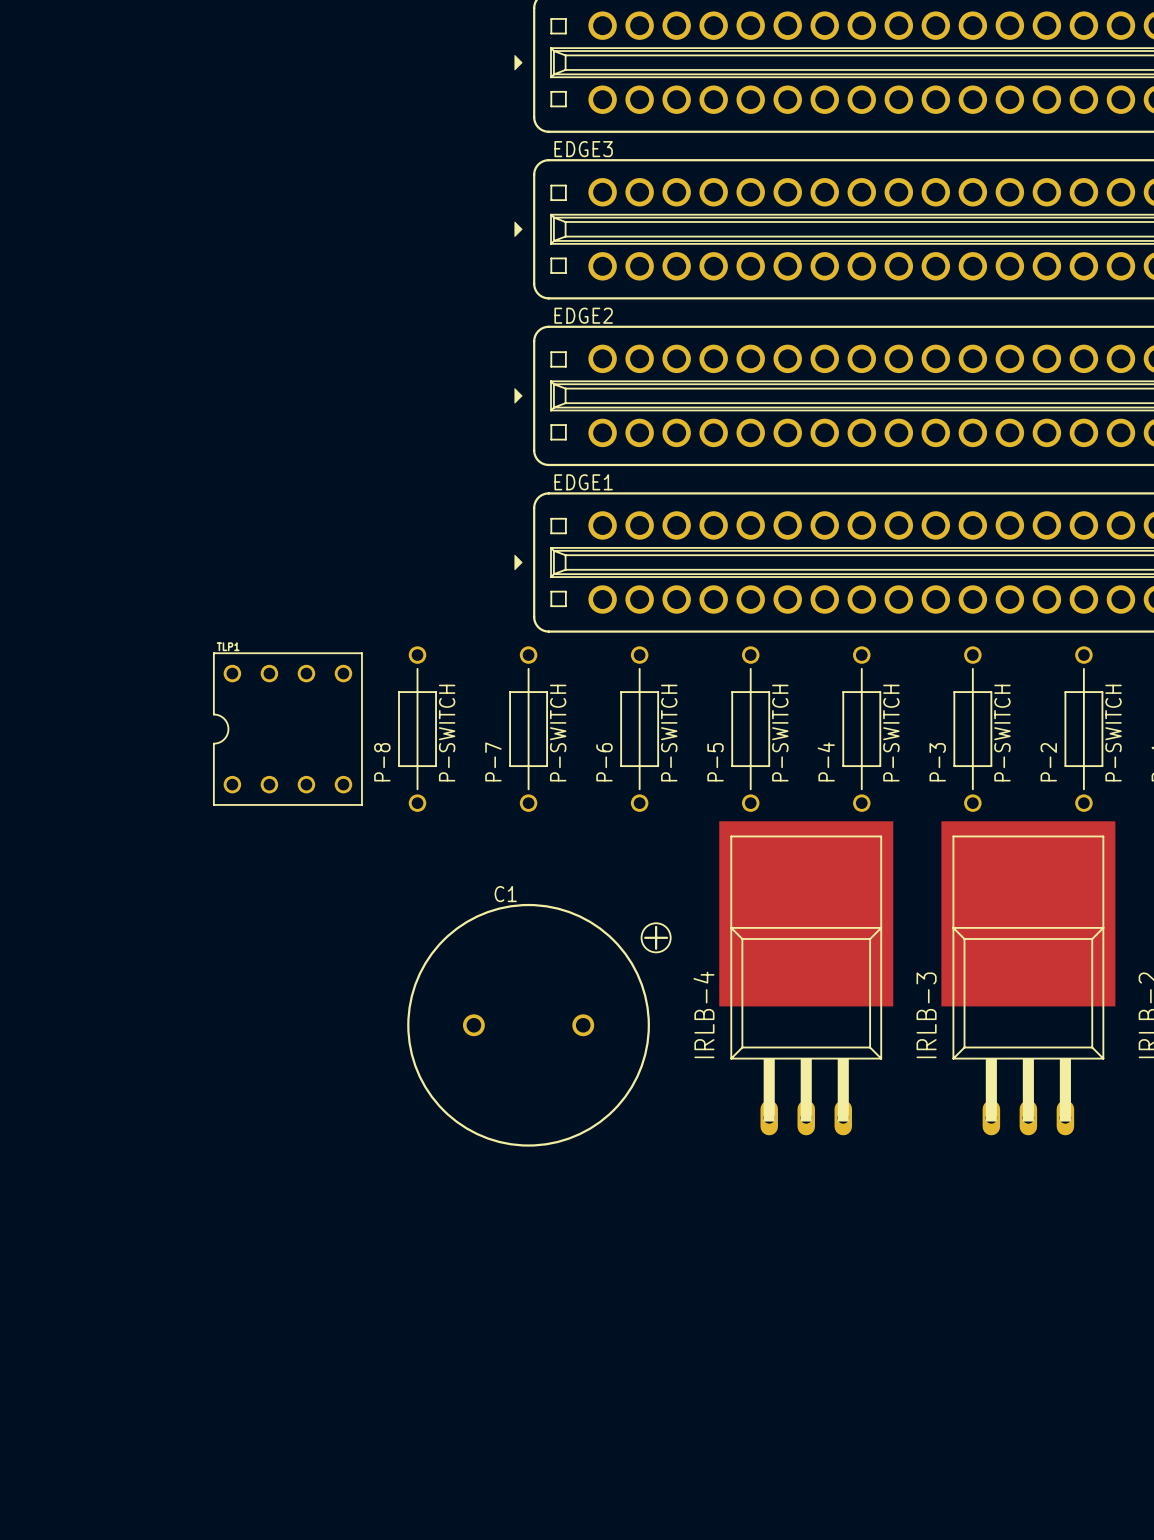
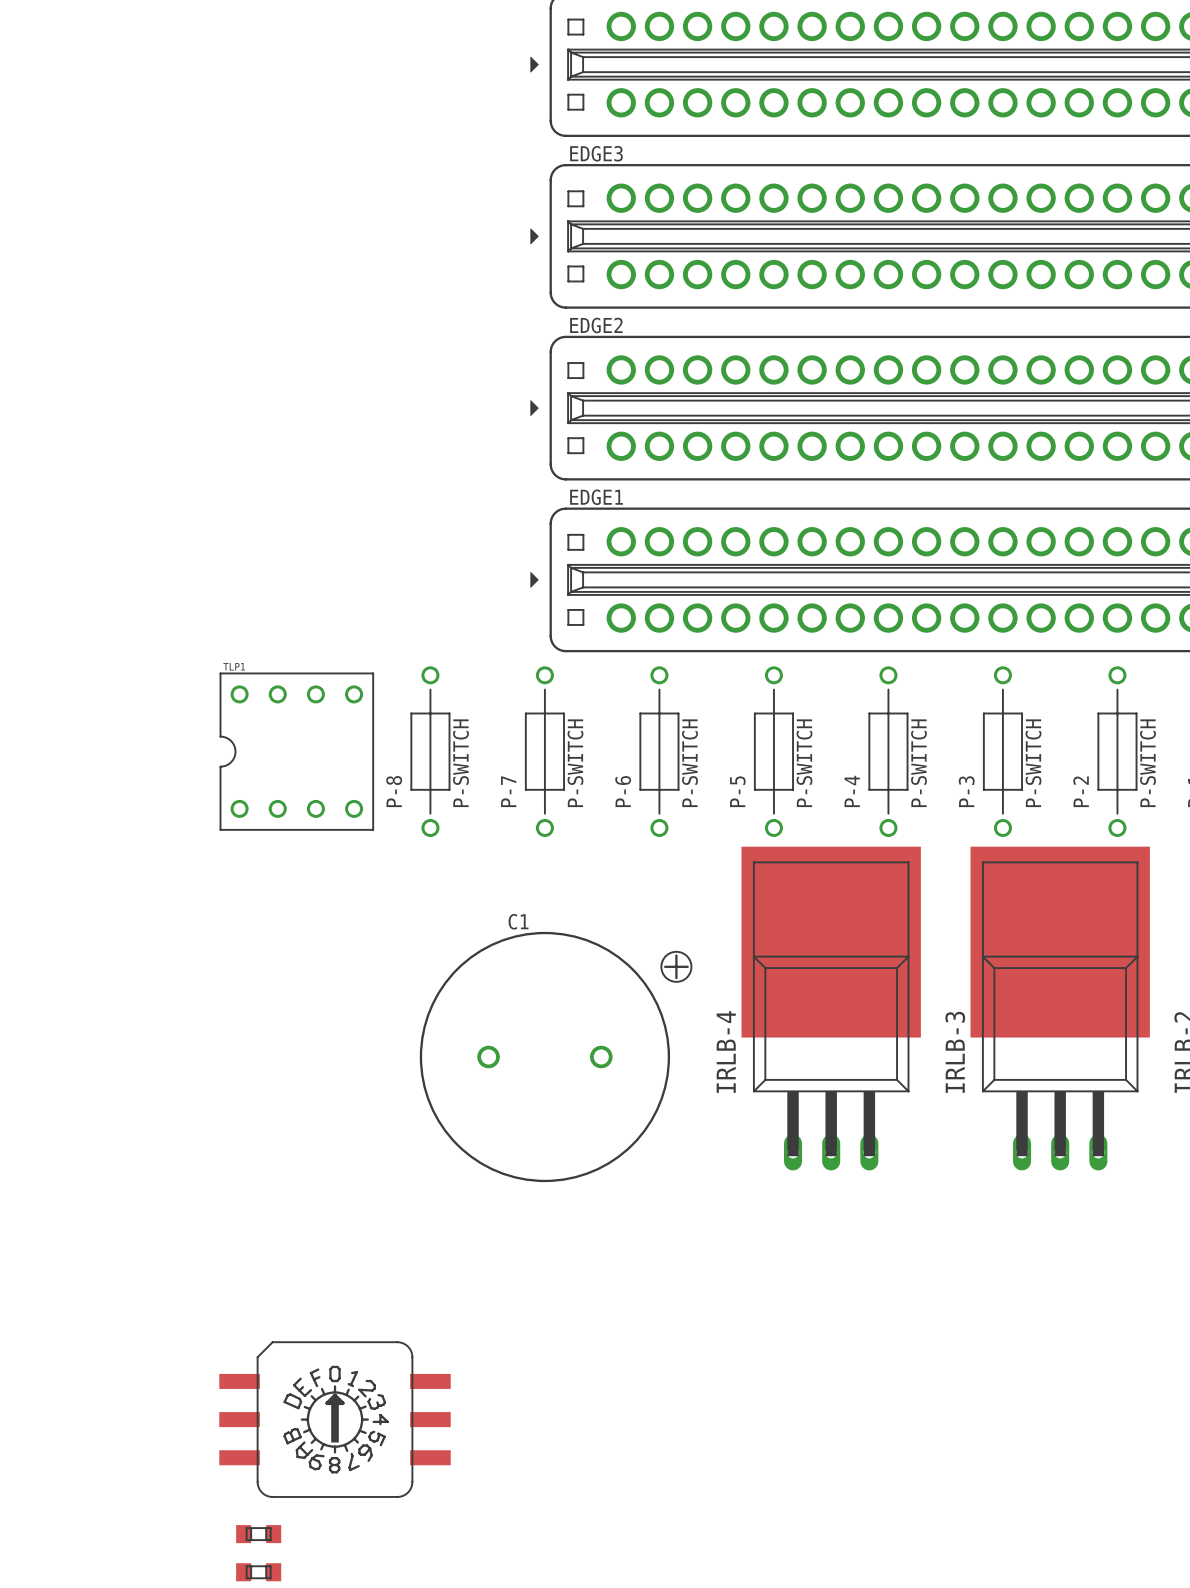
part: none -> (335, 1419)
part: none -> (258, 1534)
part: none -> (258, 1572)

